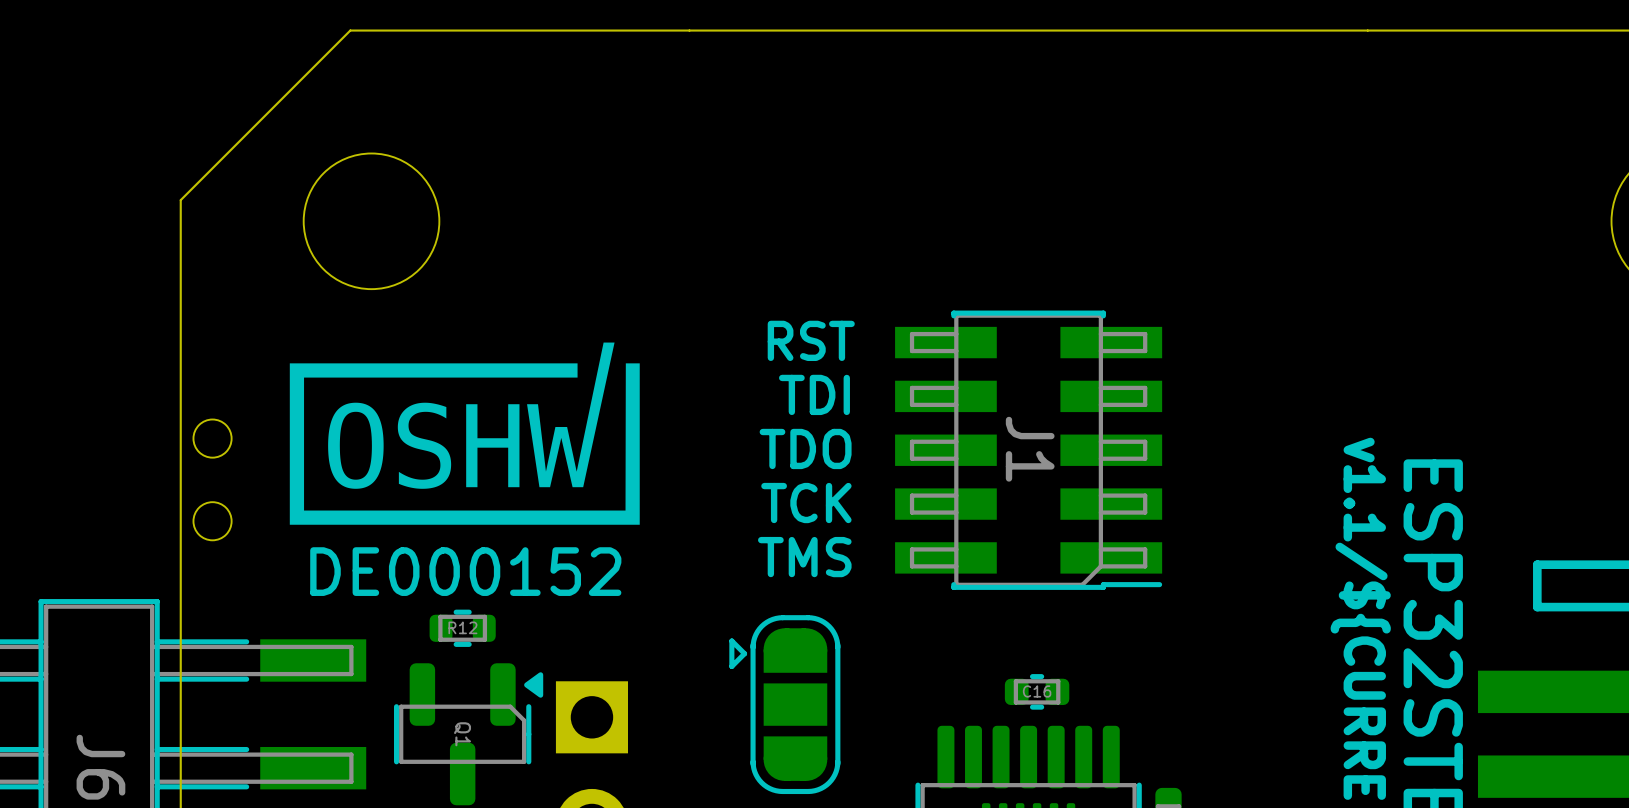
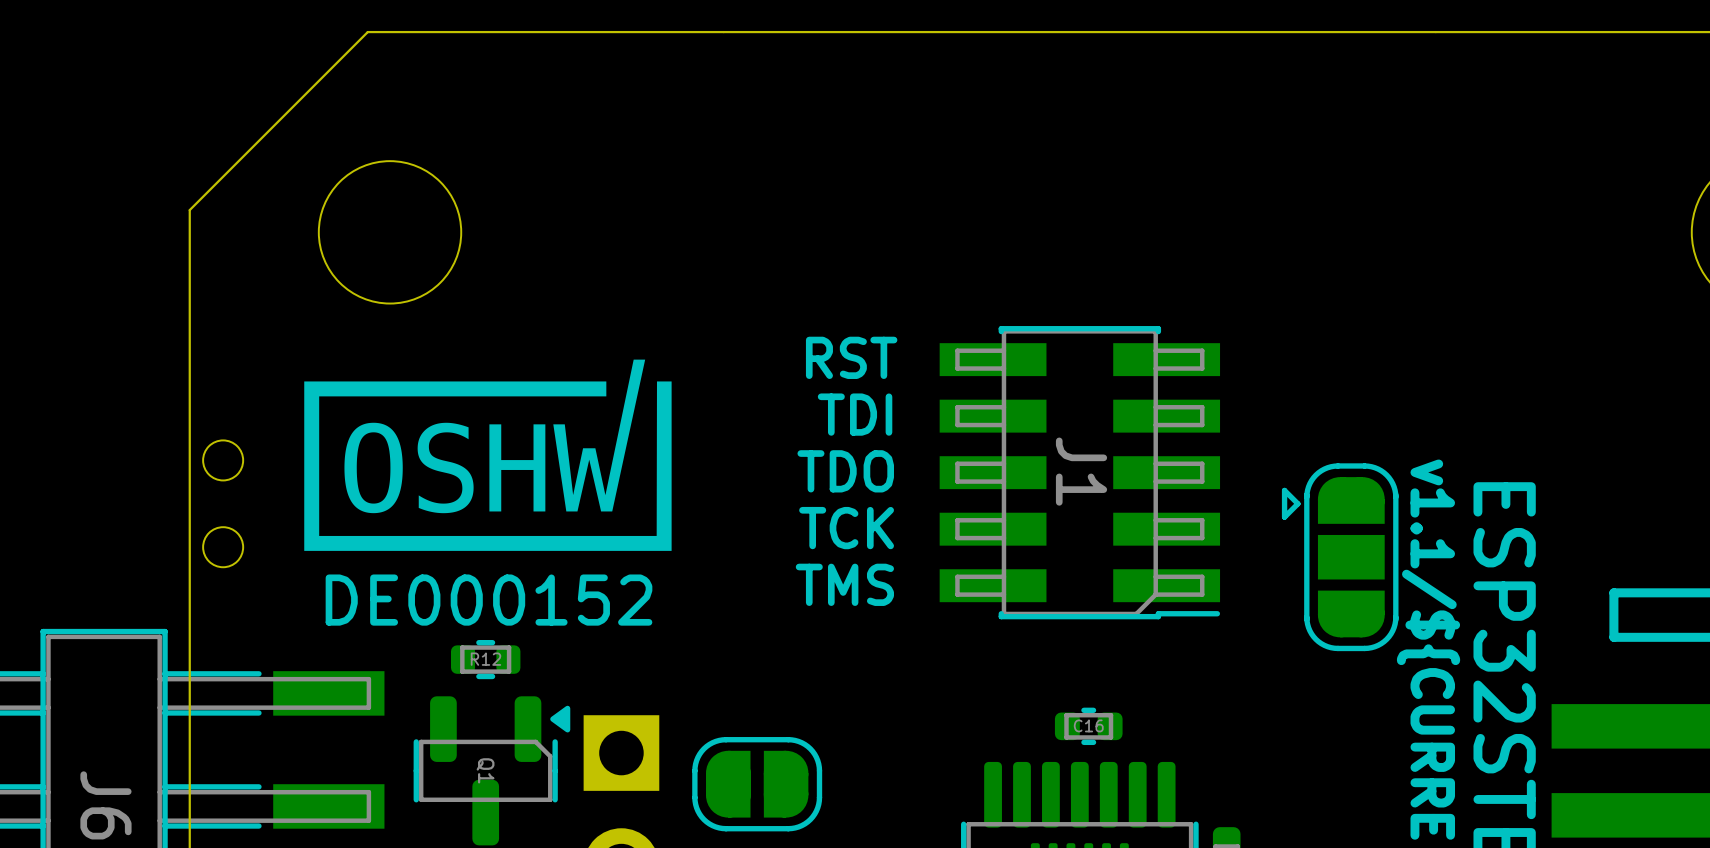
part position: (784, 704) -> (1340, 557)
part: none -> (757, 784)

